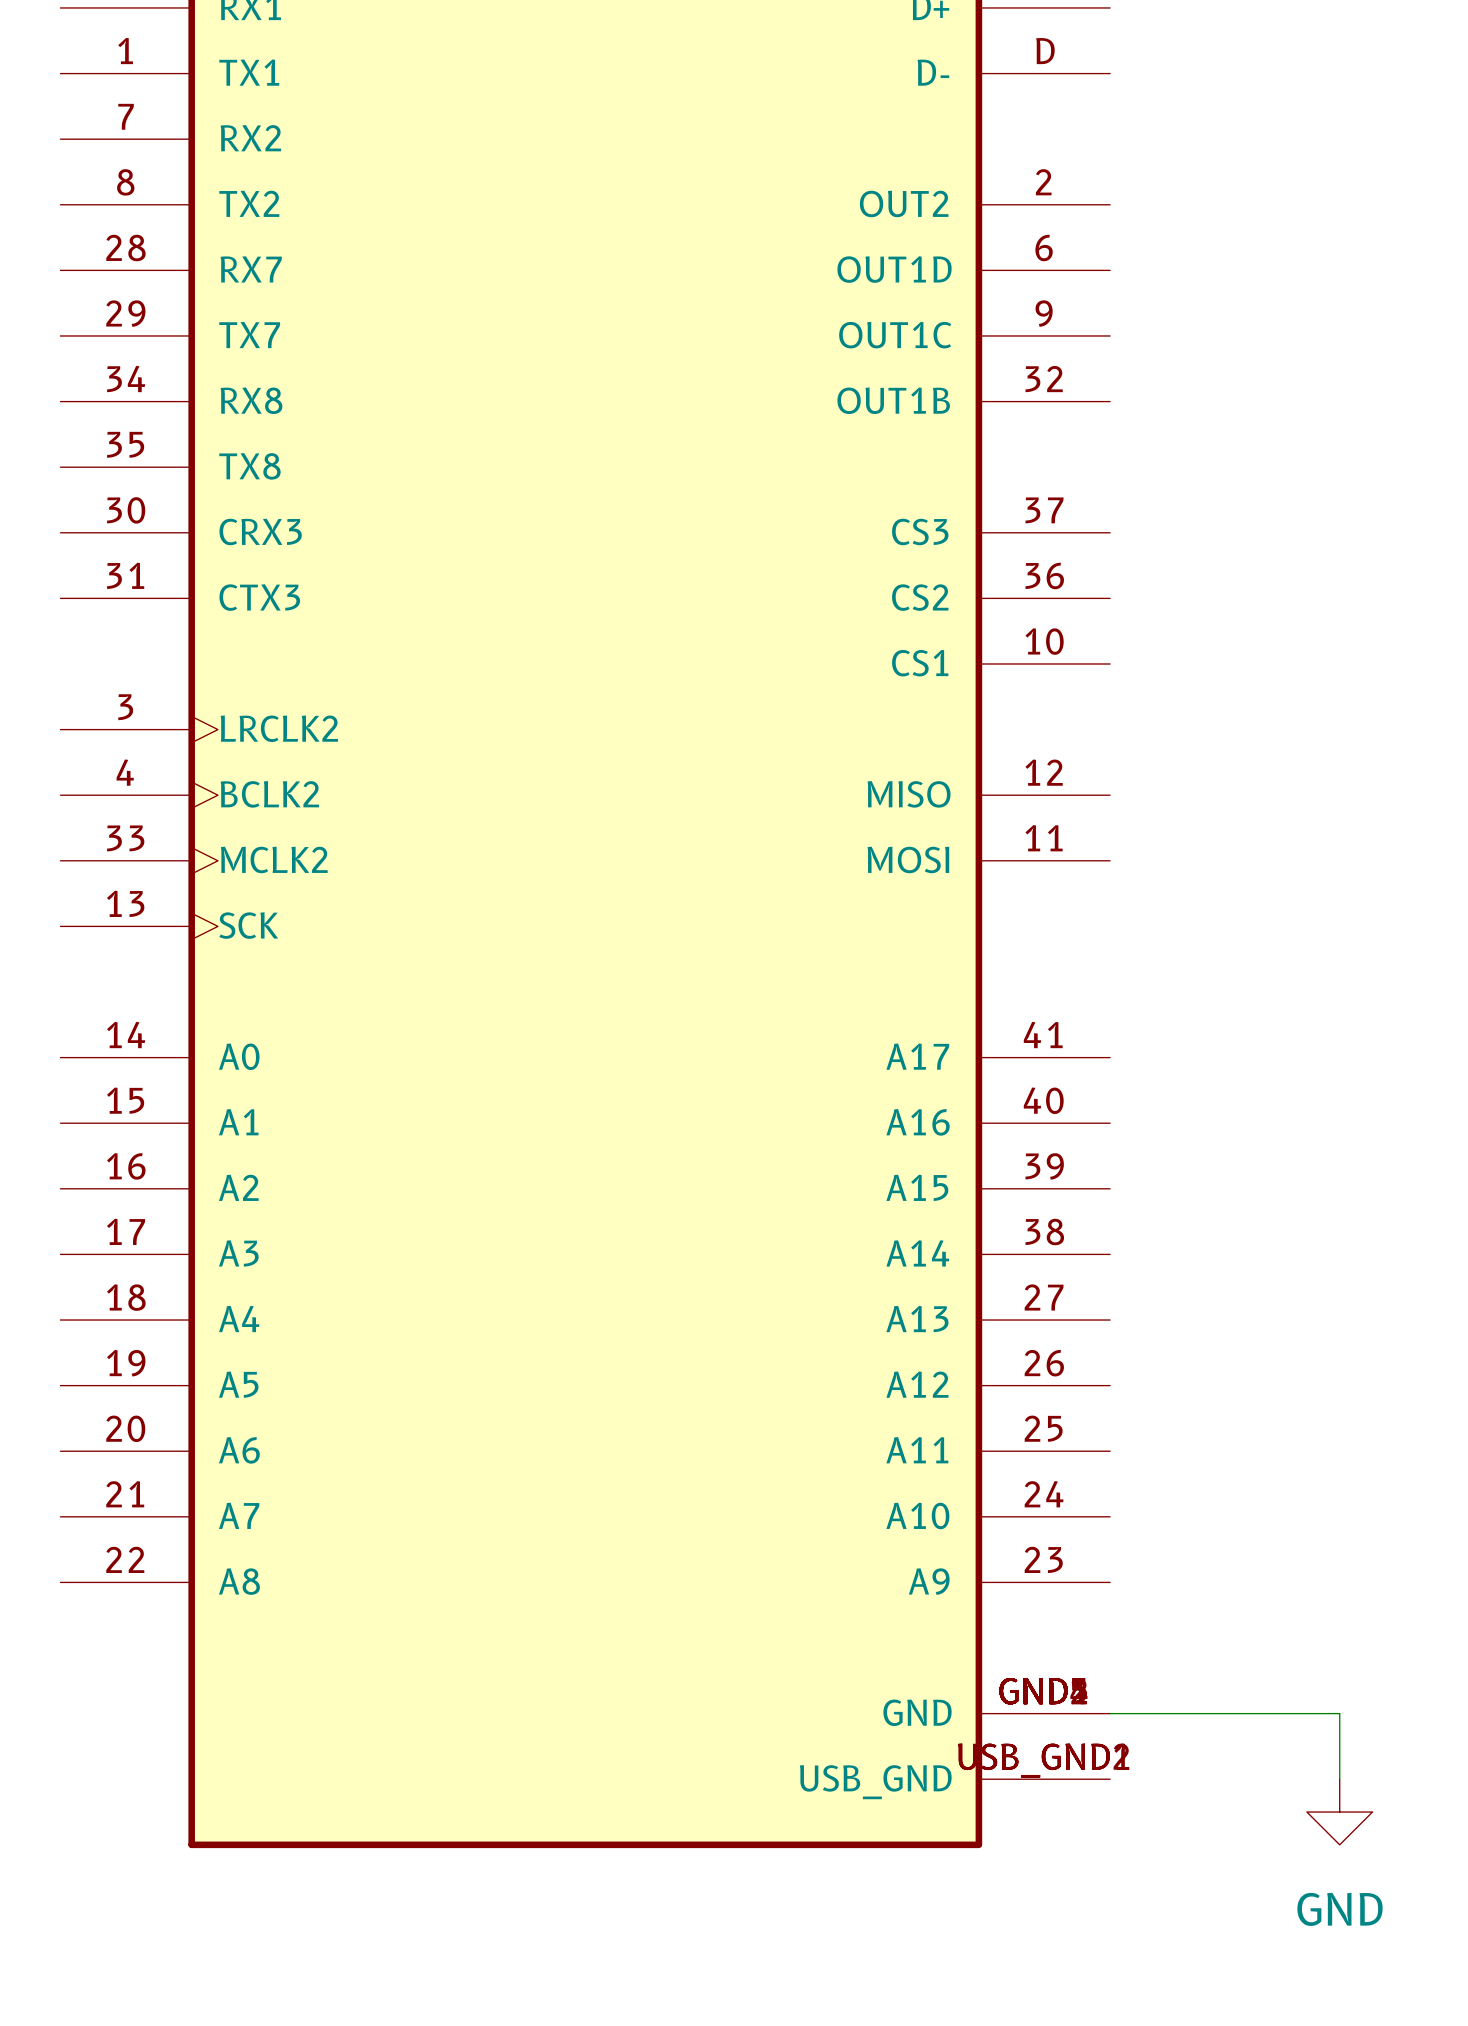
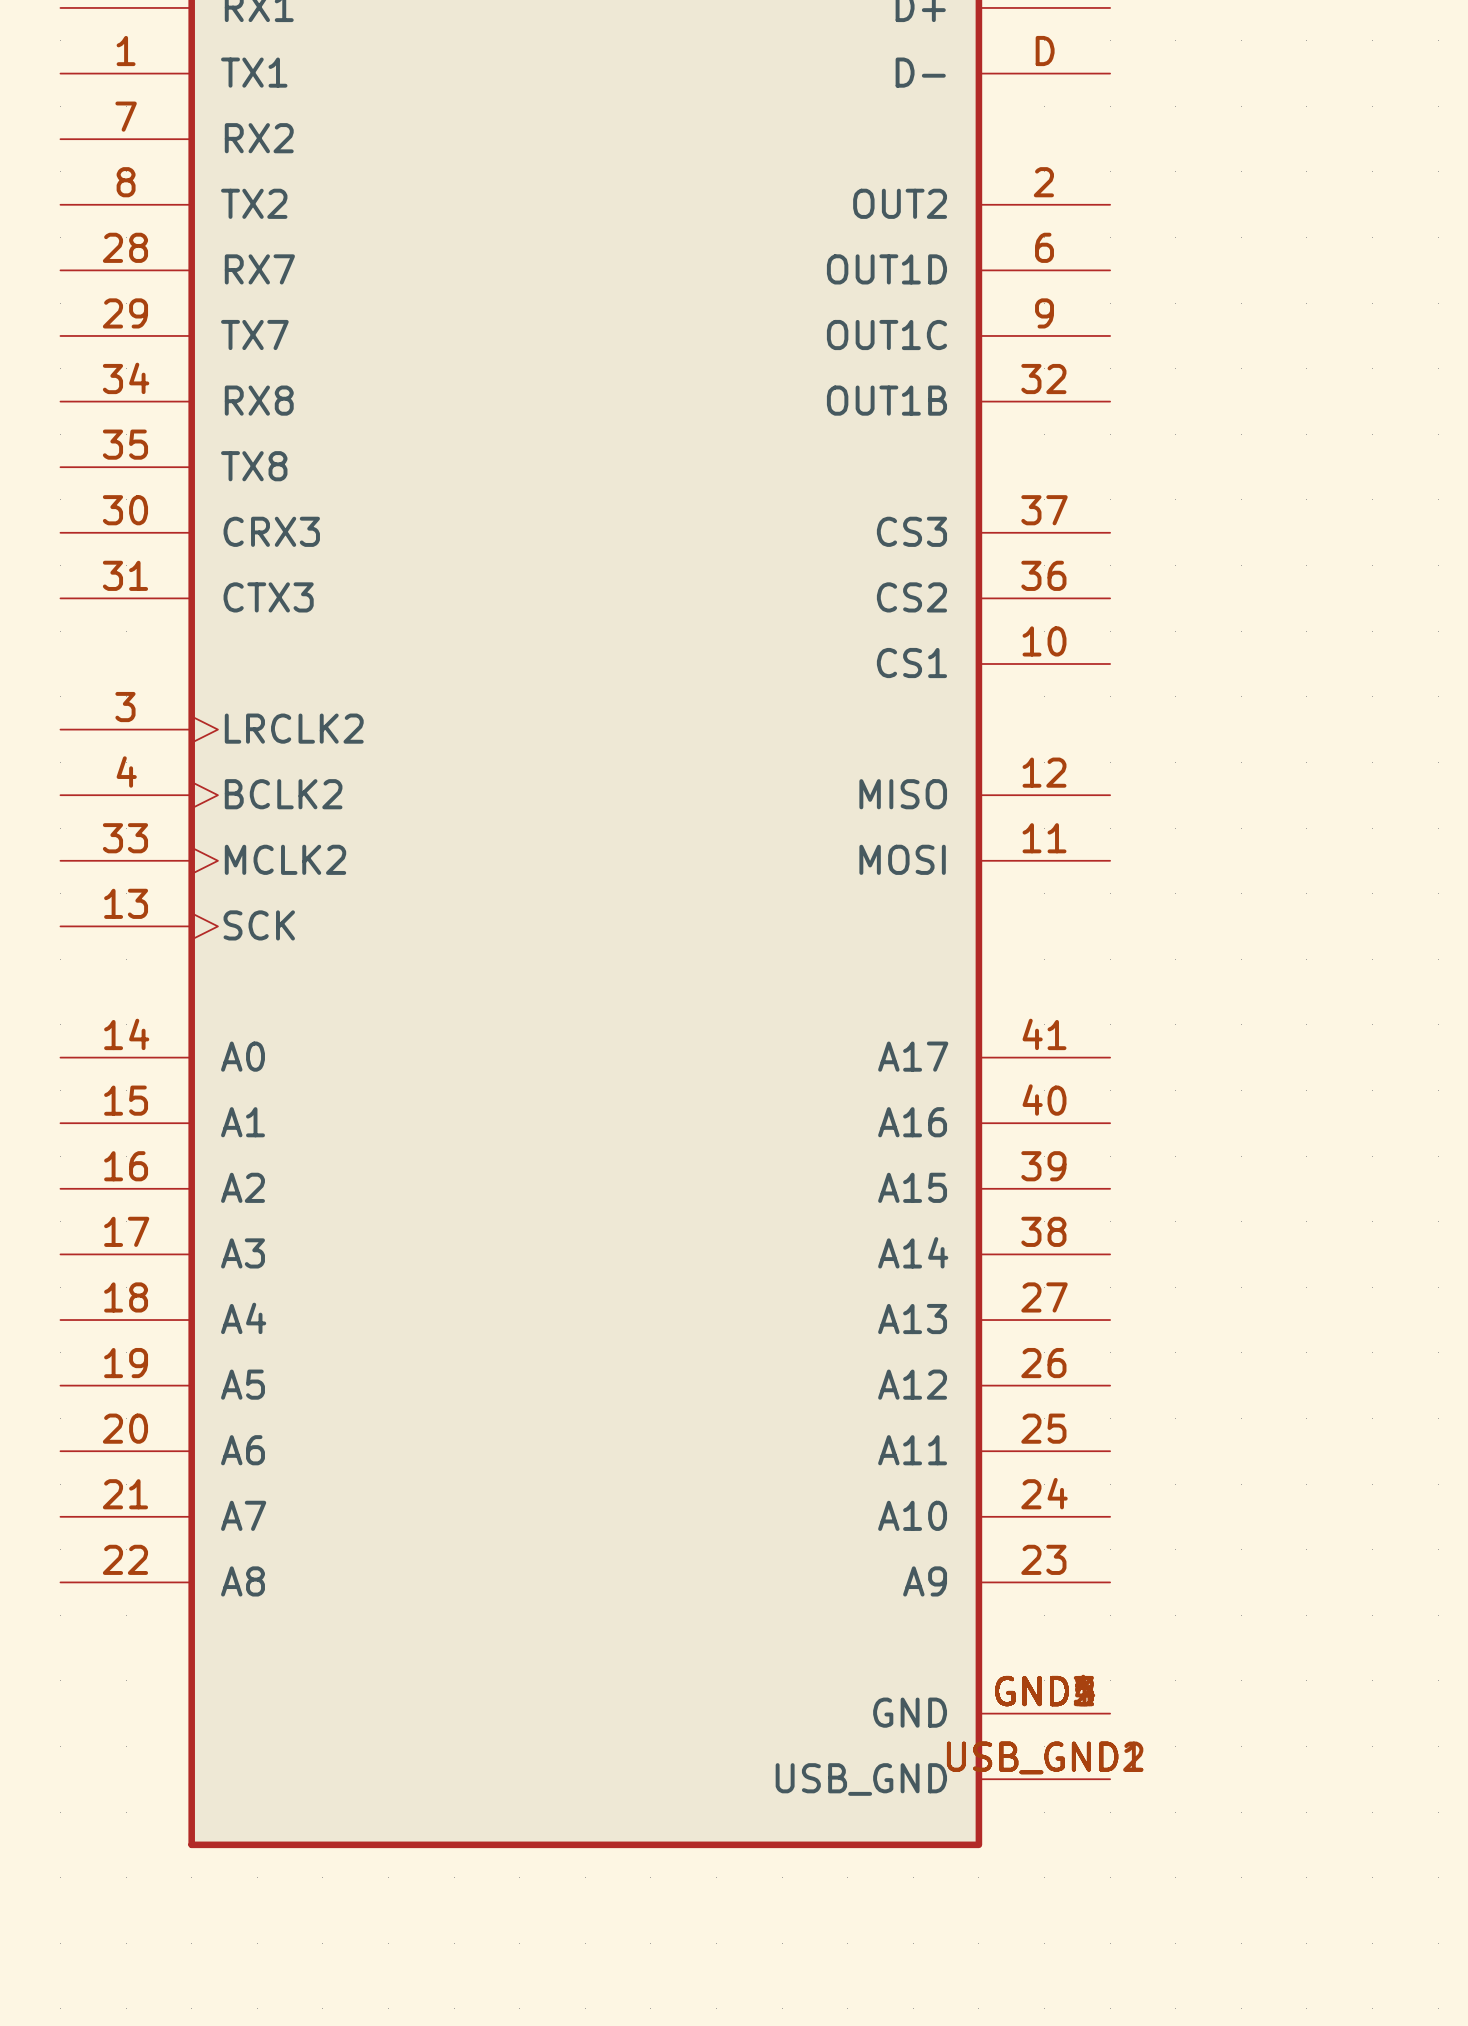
wire: (1110, 1713) (1339, 1713) (1339, 1779) -> none
power symbol: GND (1339, 1812) -> none

